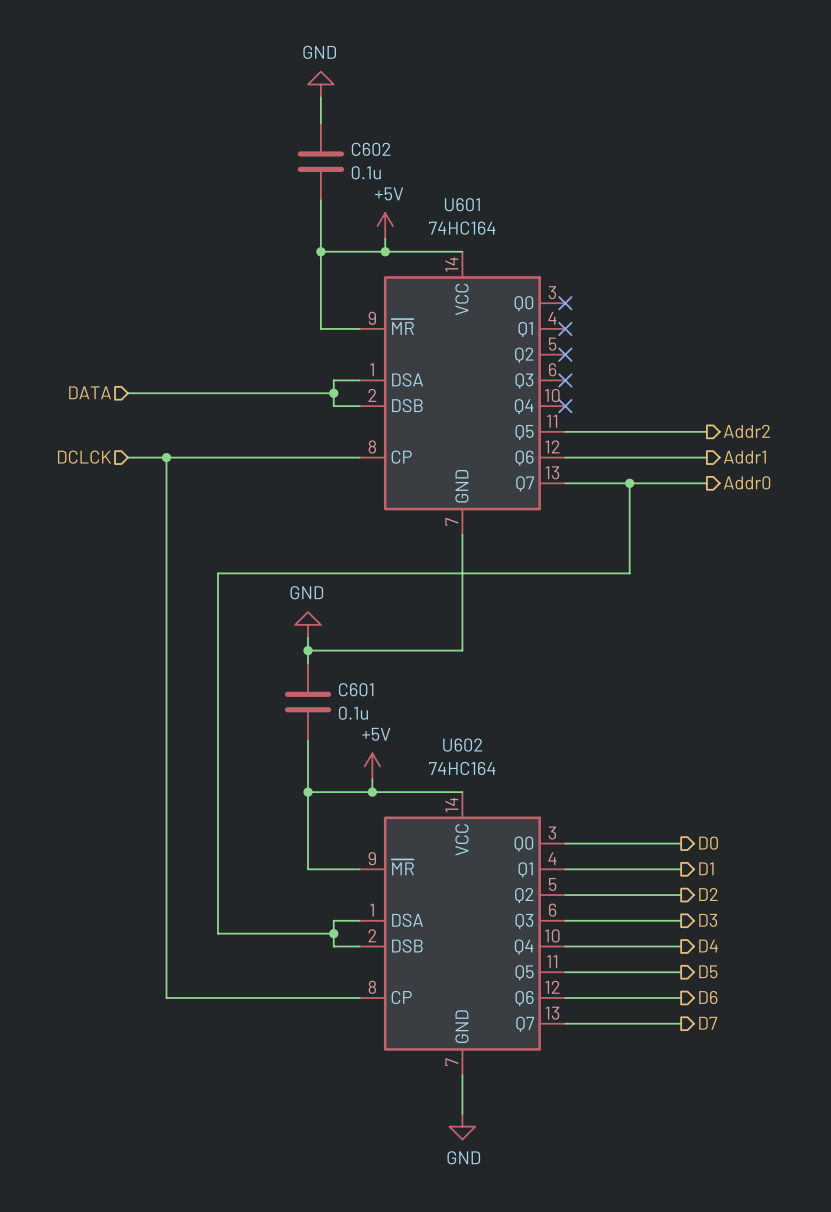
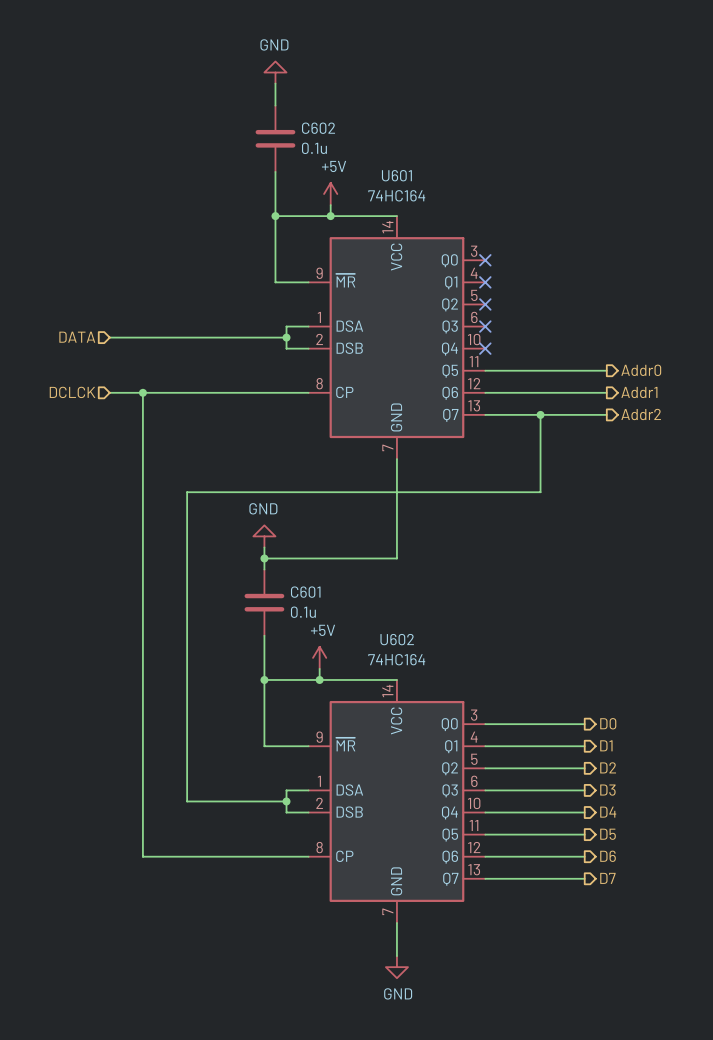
hierarchical label: Addr2 (746, 431) -> Addr0 (641, 370)
hierarchical label: Addr0 (747, 482) -> Addr2 (641, 414)

